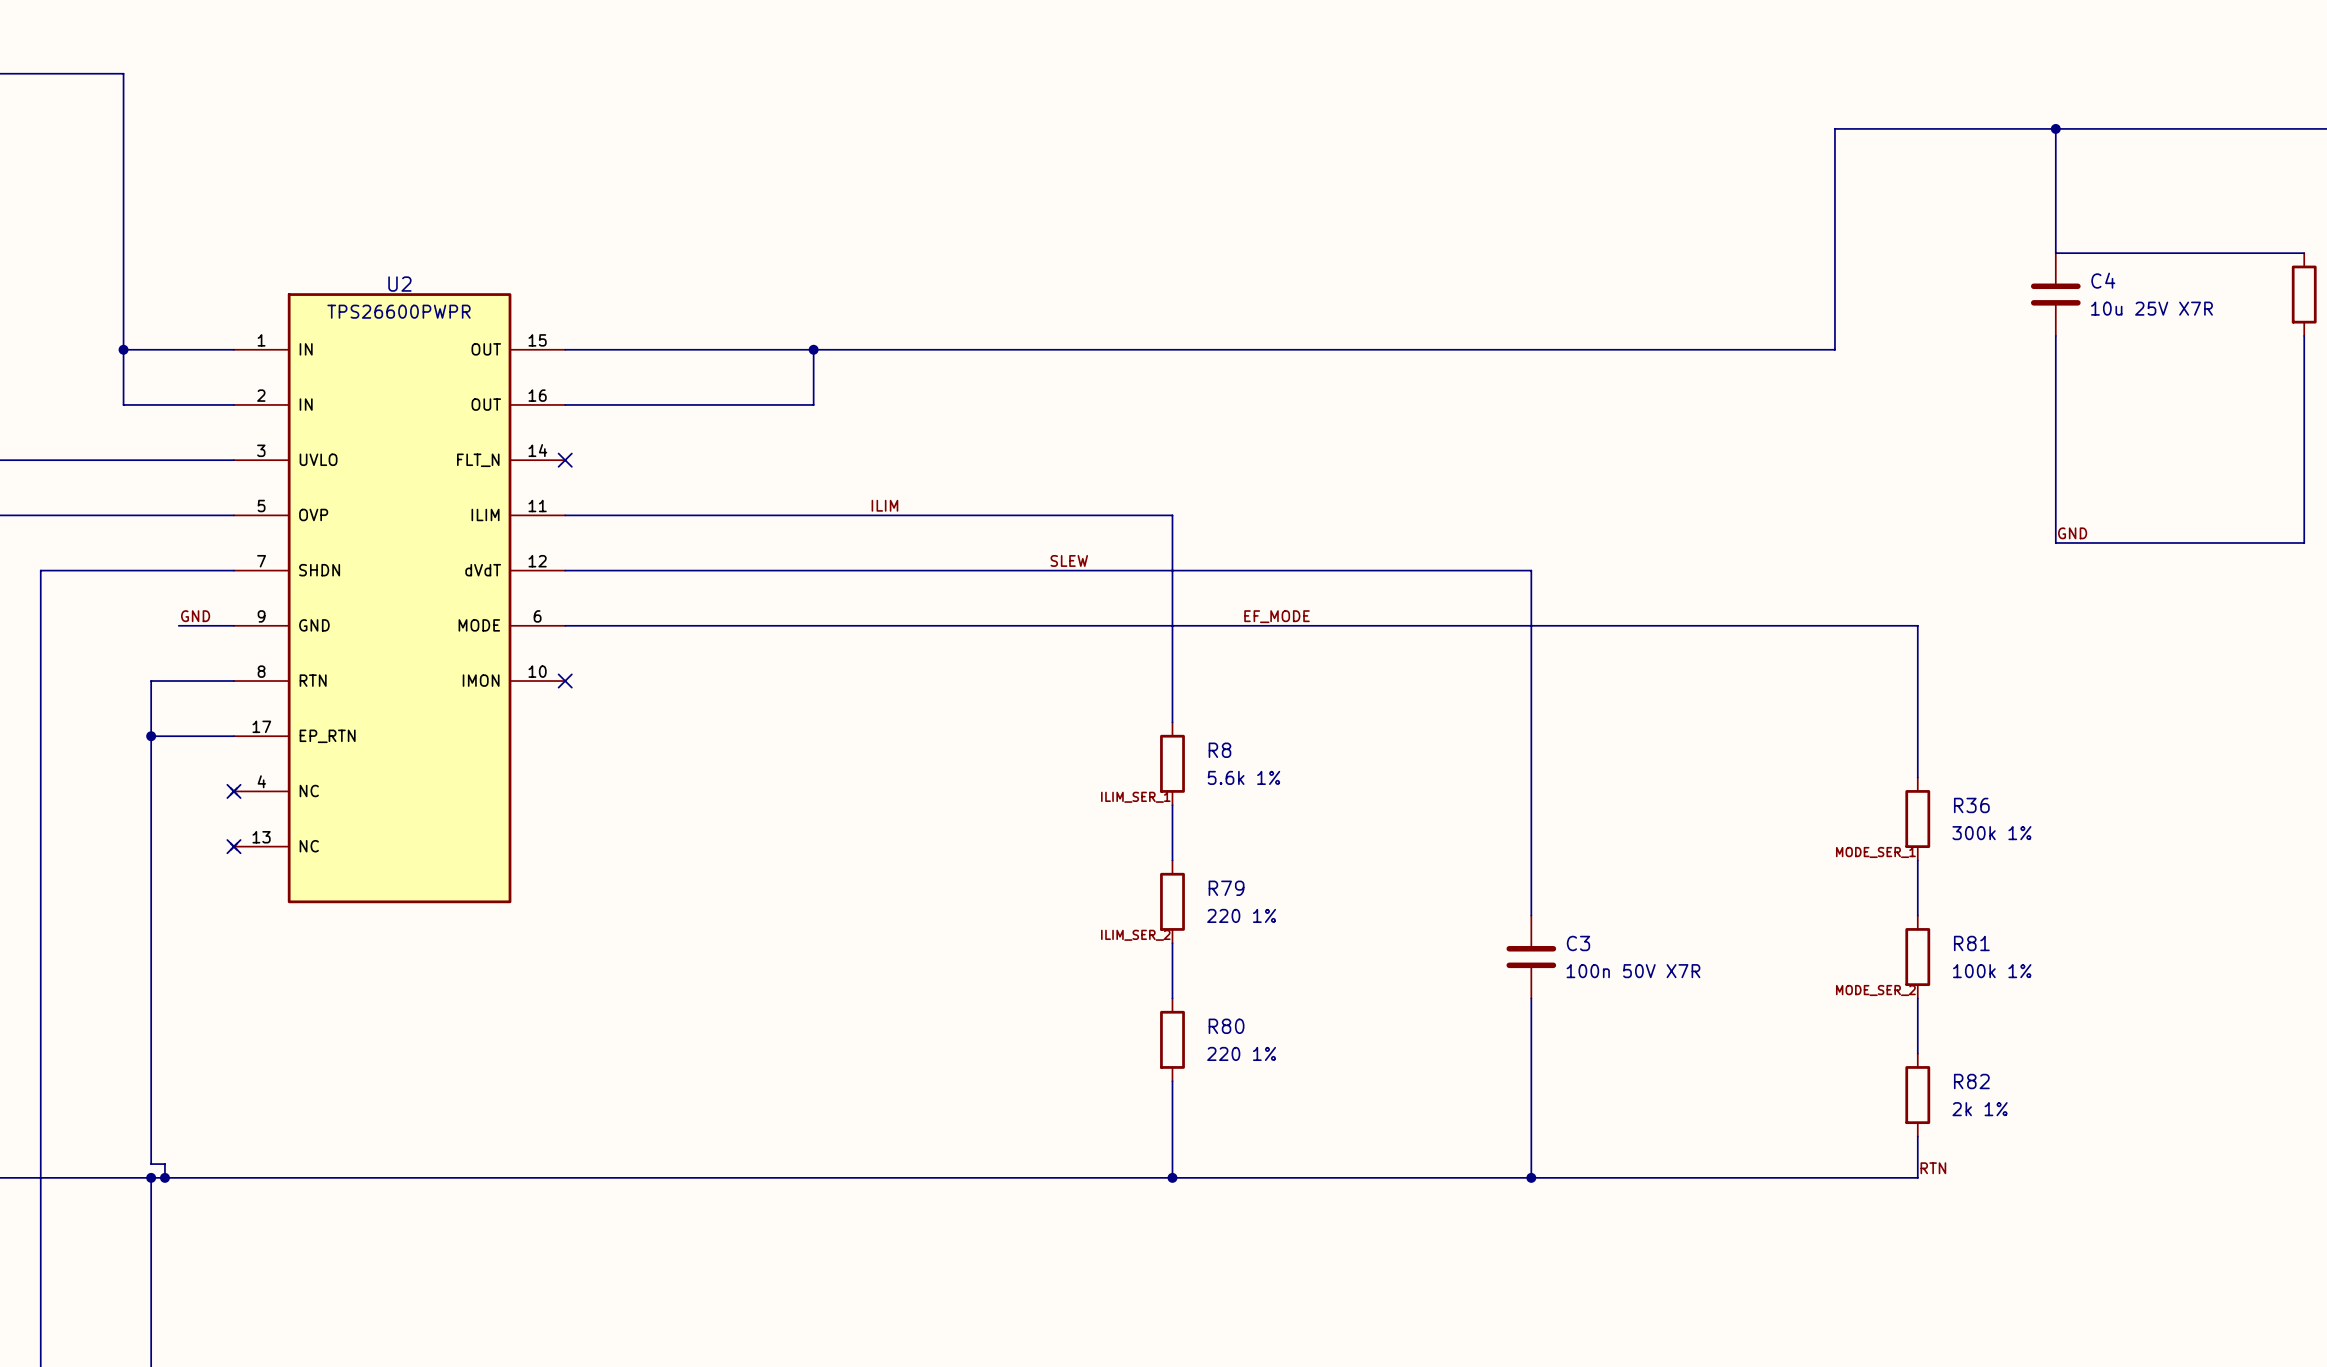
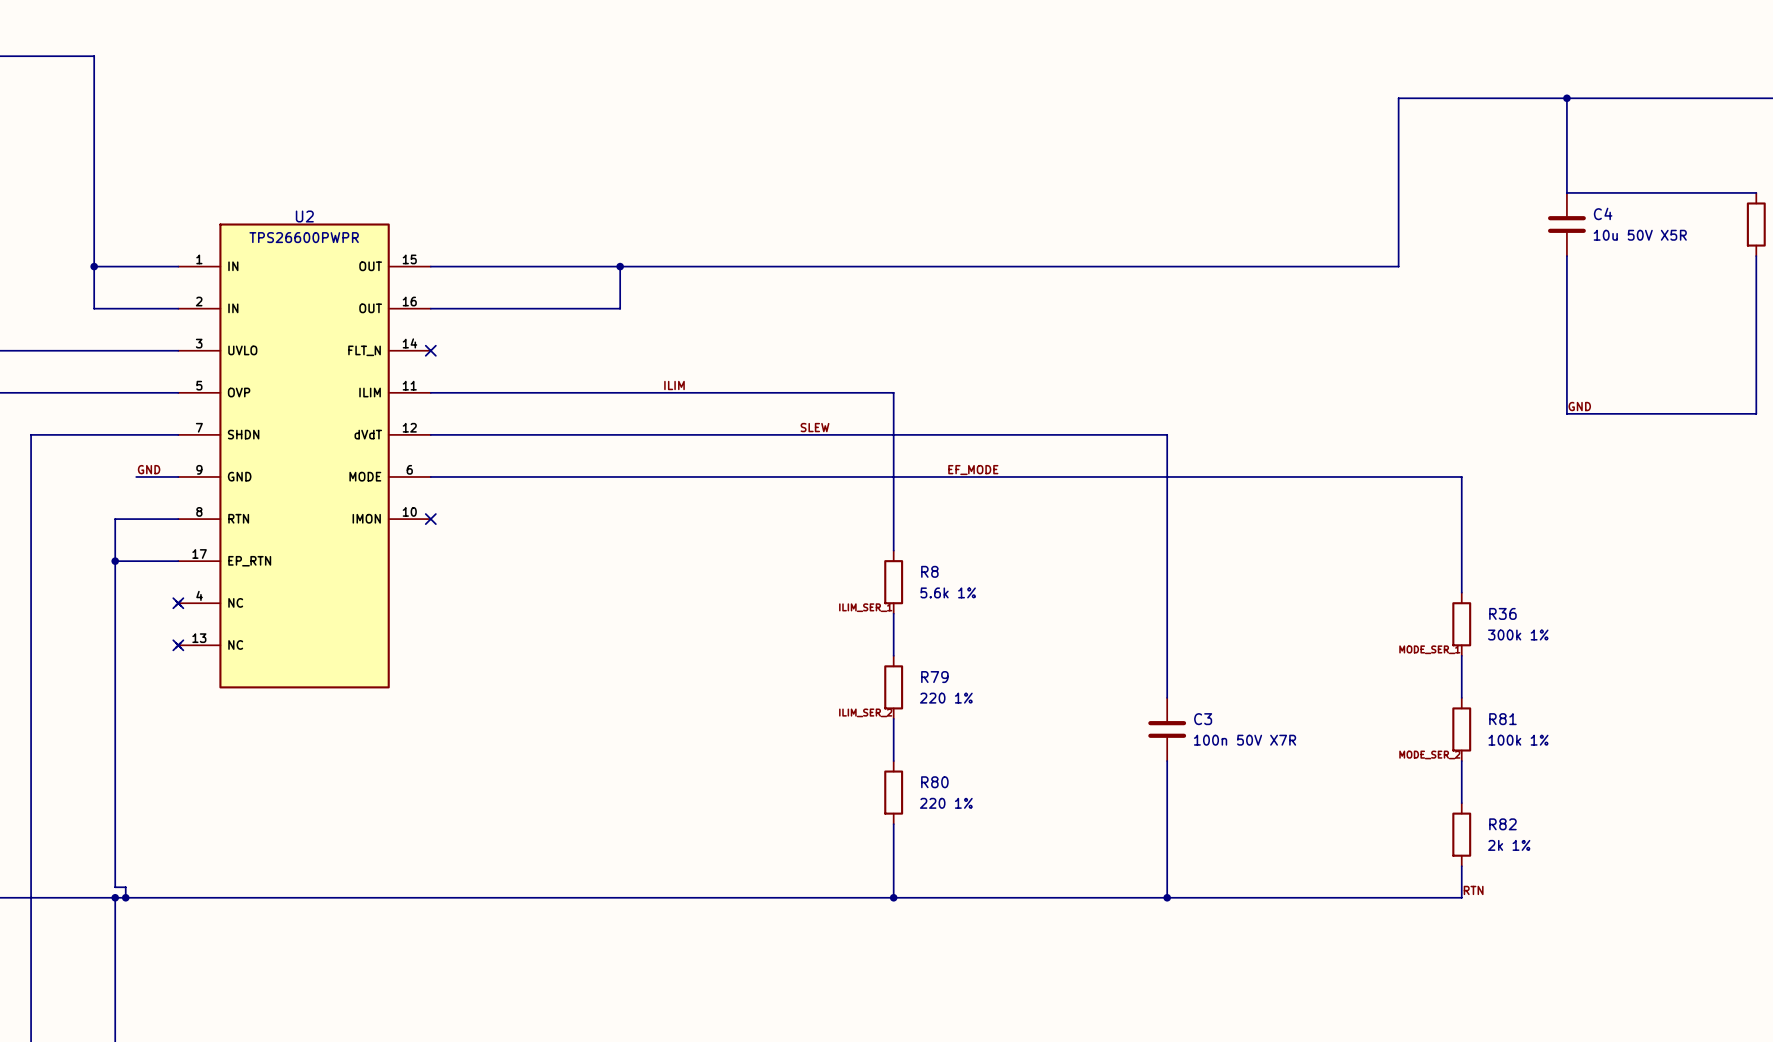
C4 value: 10u 25V X7R (2151, 308) -> 10u 50V X5R (1640, 235)

